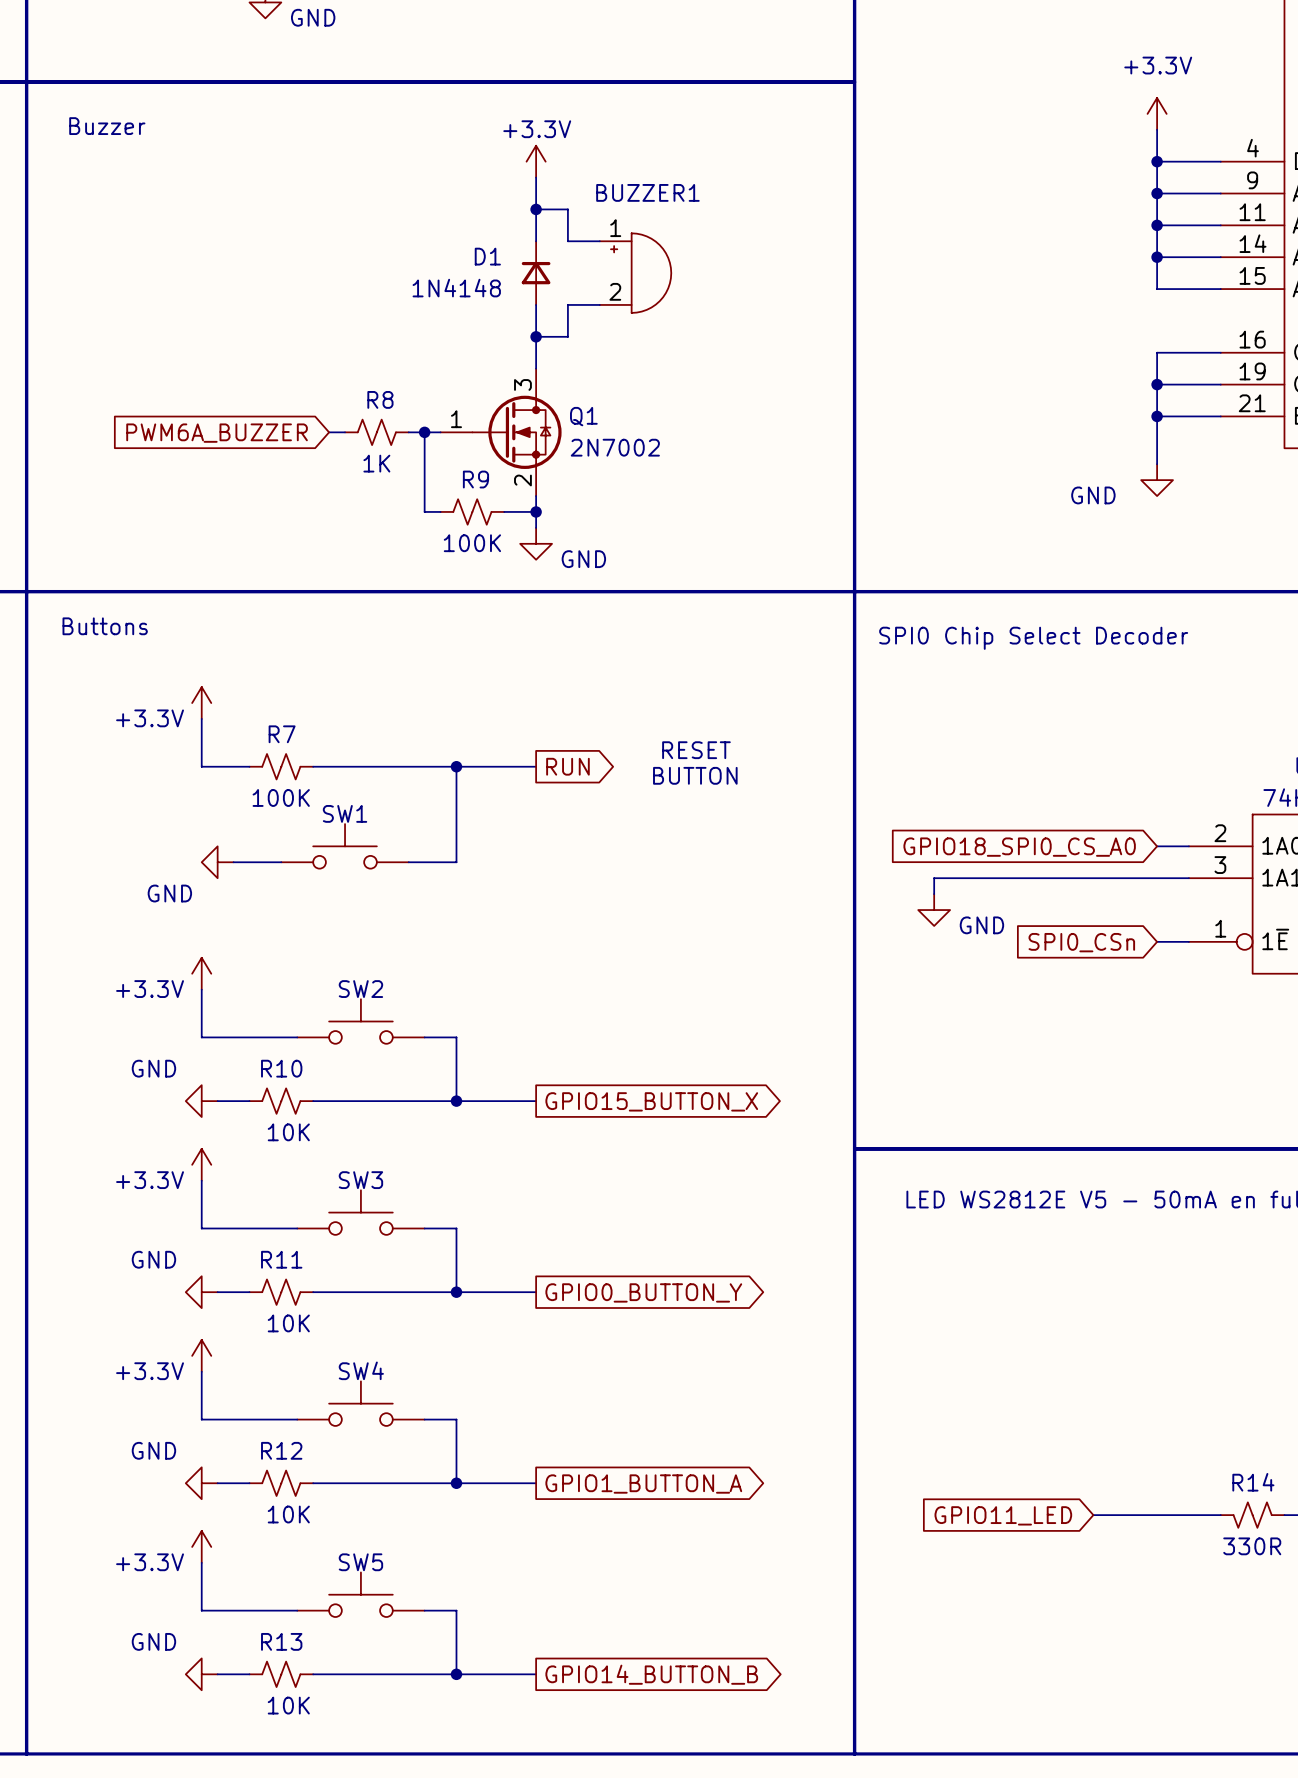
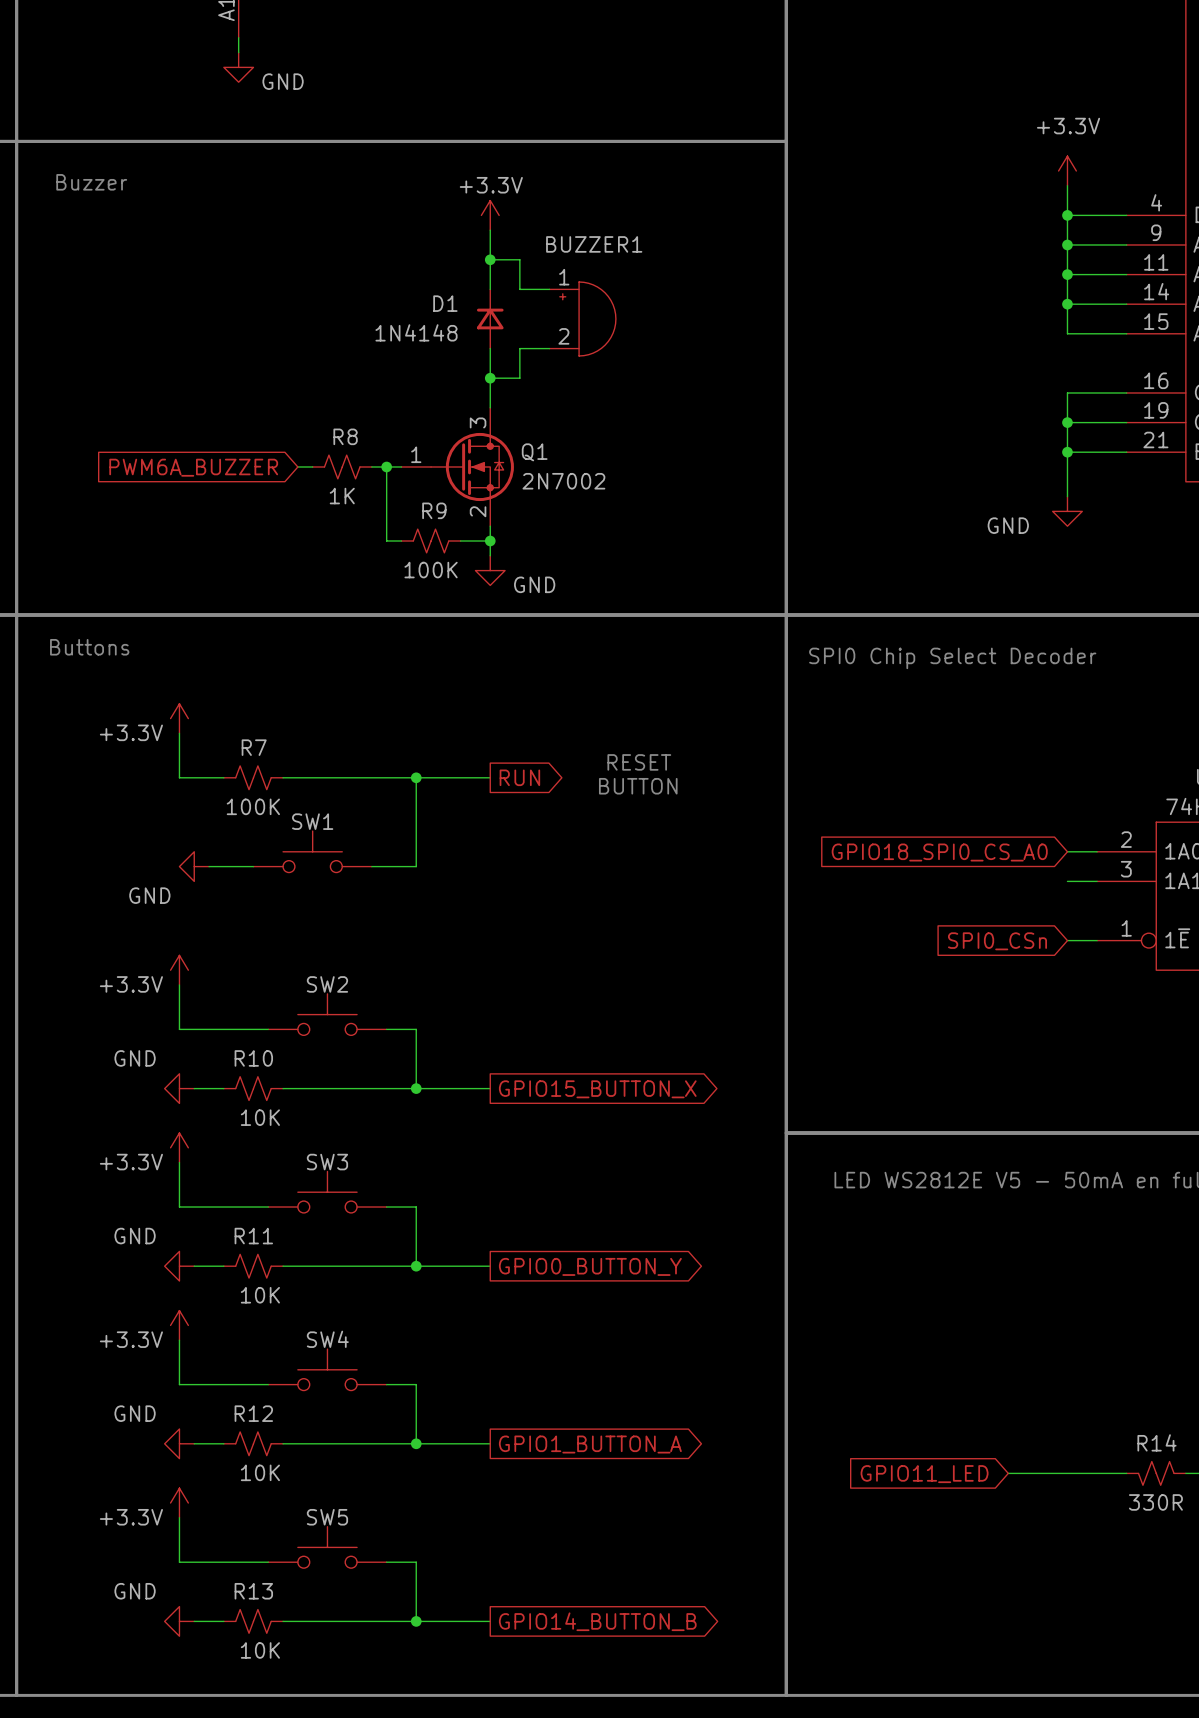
wire: (1157, 878) (934, 878) (934, 894) -> none
power symbol: GND (934, 910) -> none

